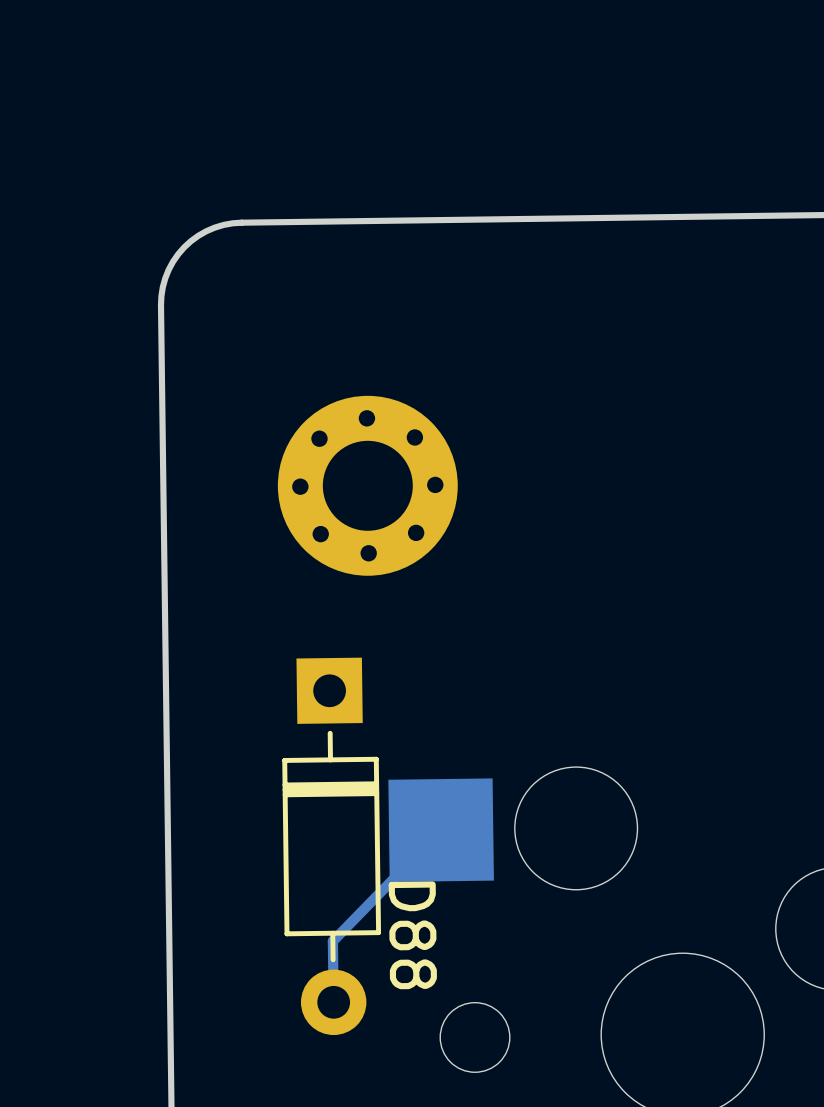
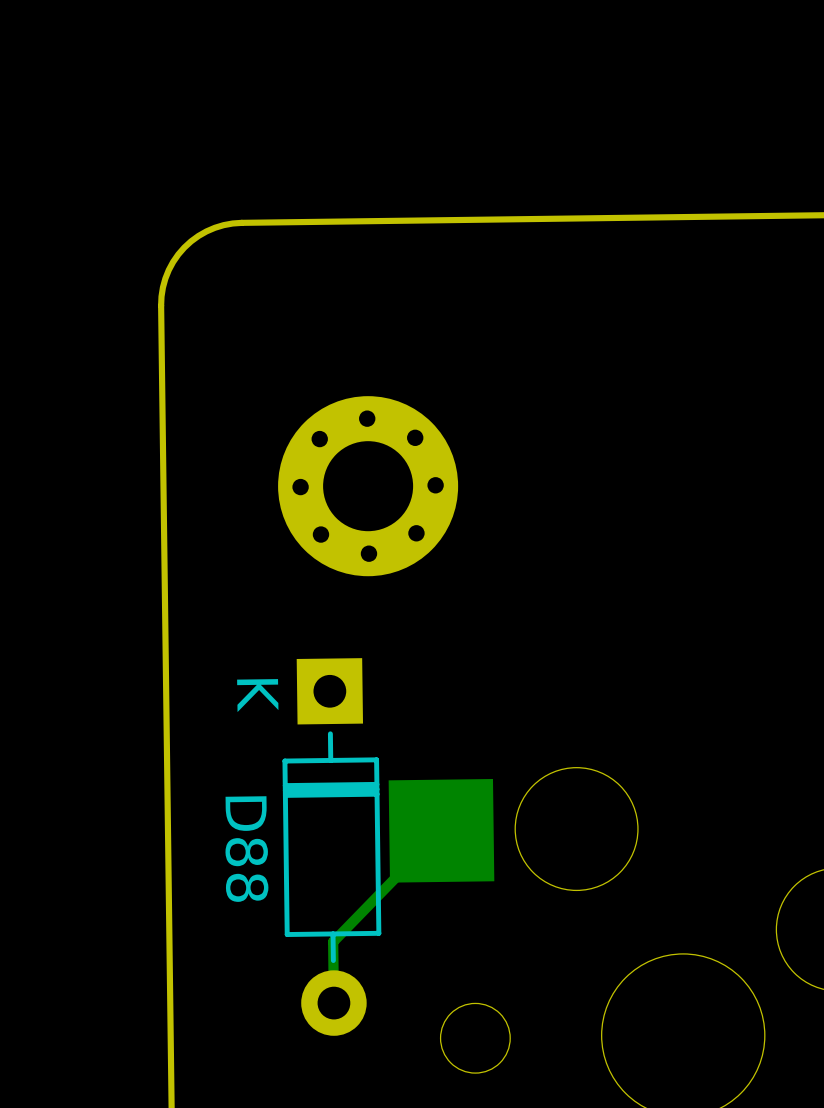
D88 text: none -> K (257, 695)
D88 name position: D88 (412, 935) -> D88 (246, 849)

